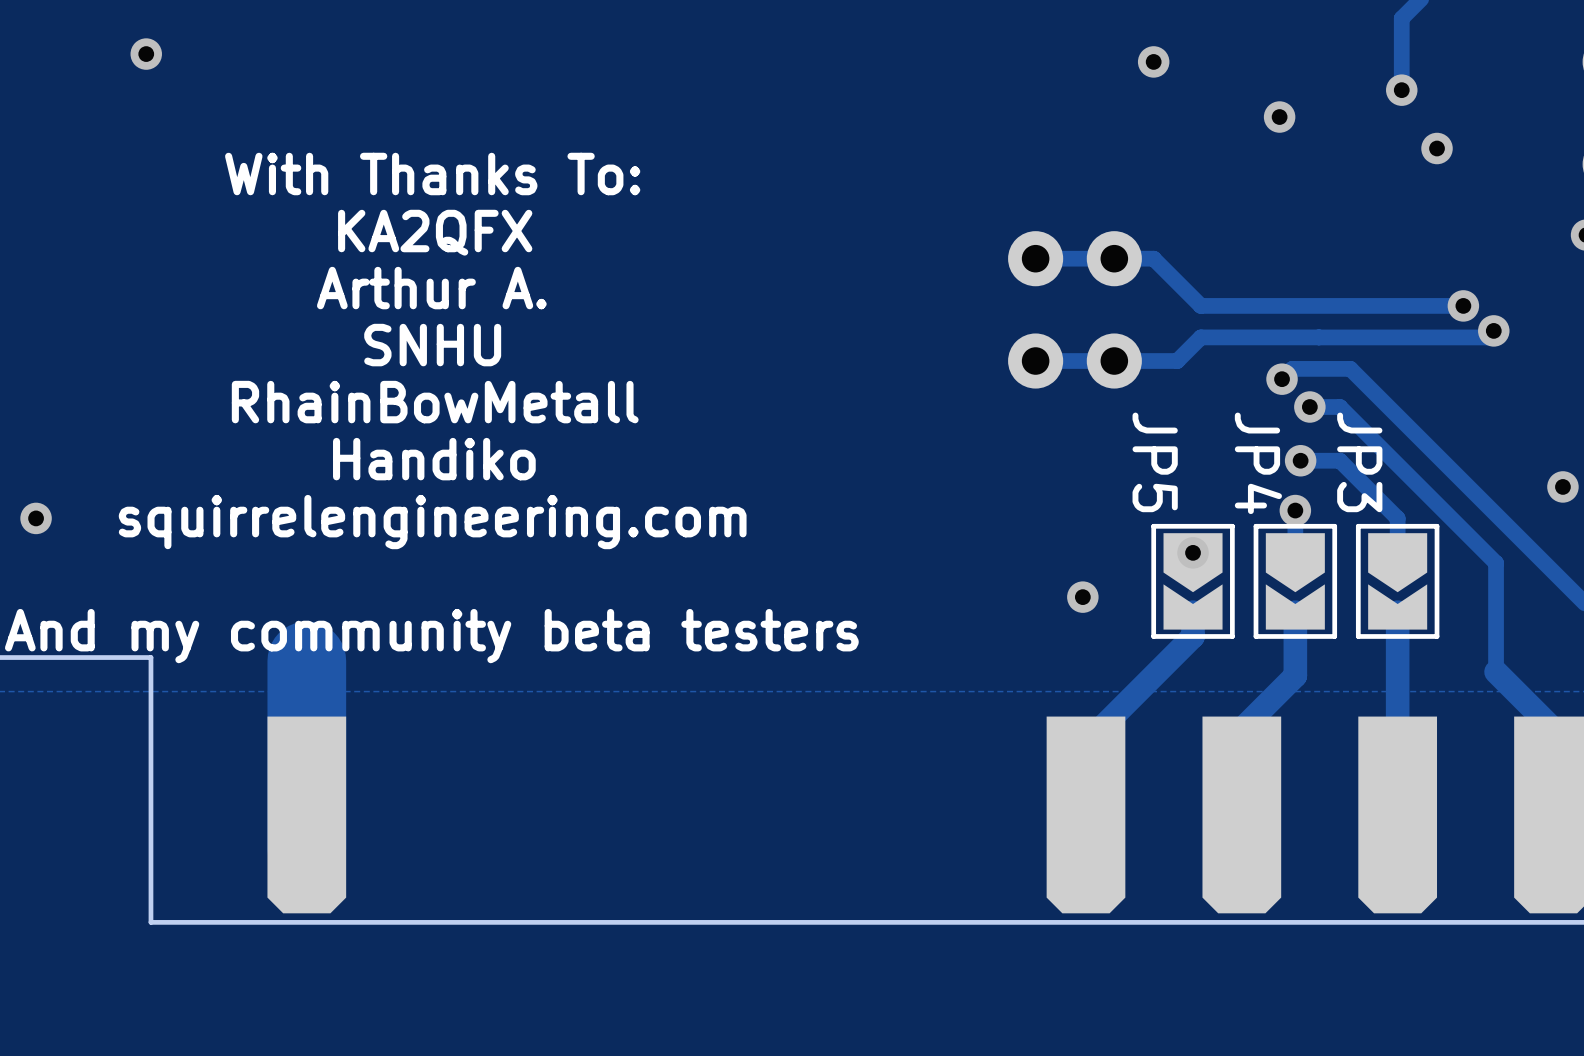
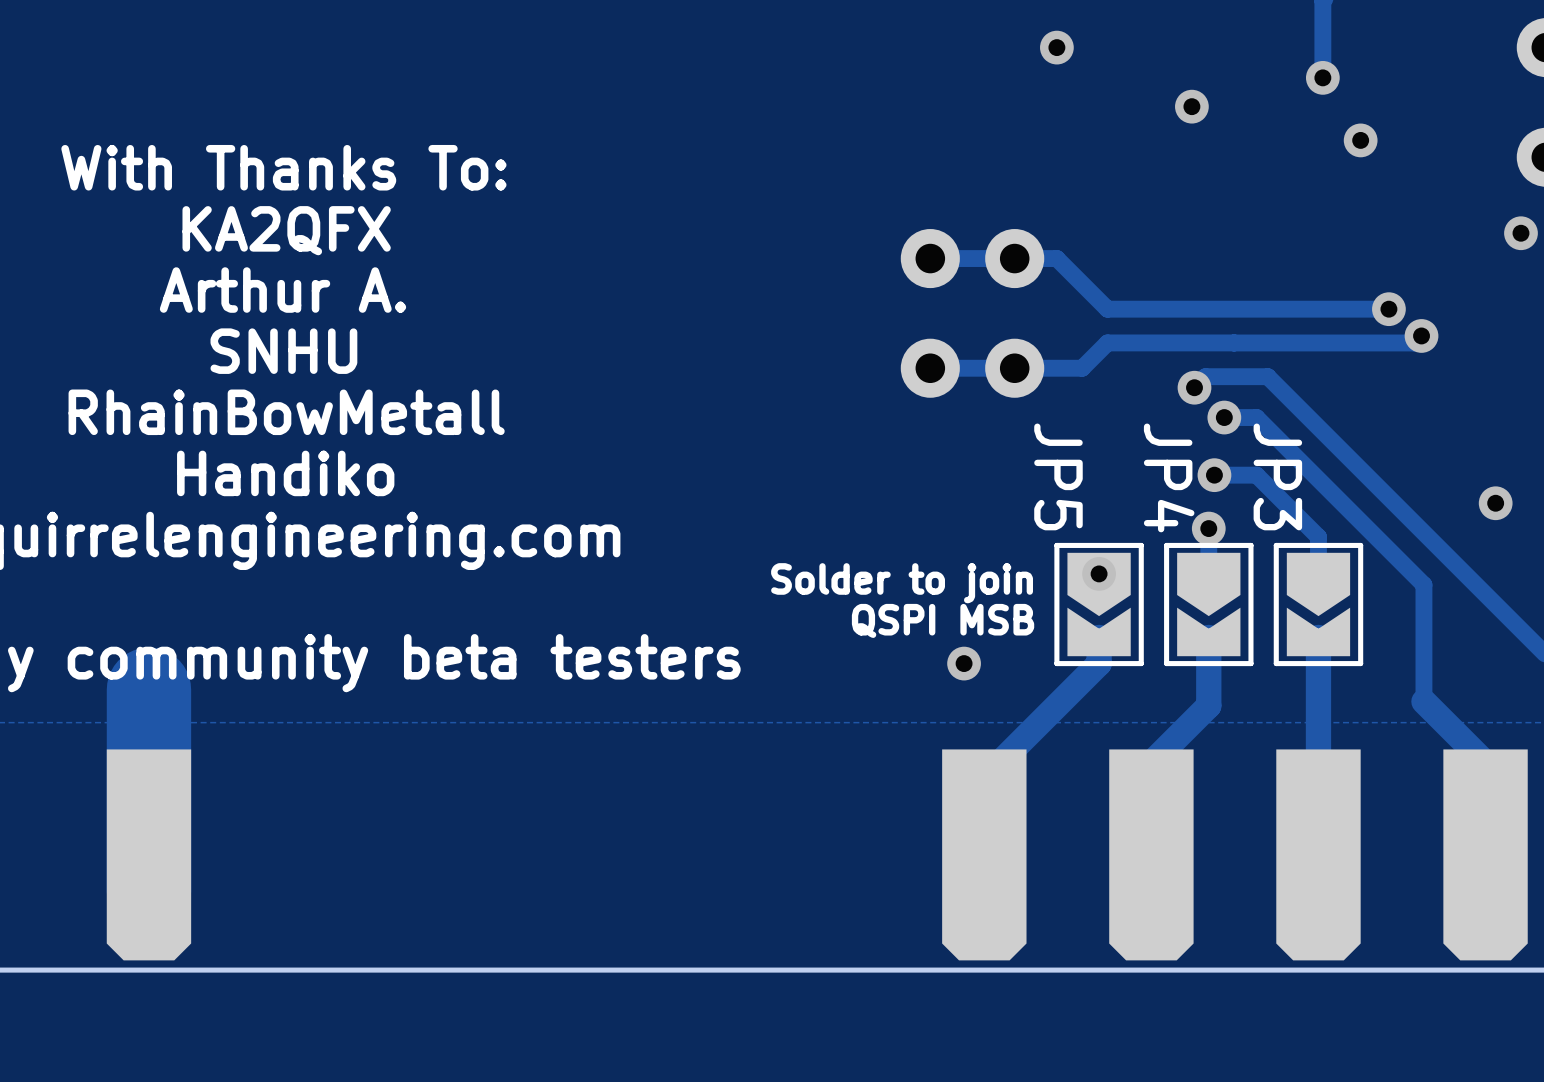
text: none -> Solder to join (902, 583)
text: none -> QSPI MSB (943, 620)
via position: (1082, 597) -> (964, 663)

